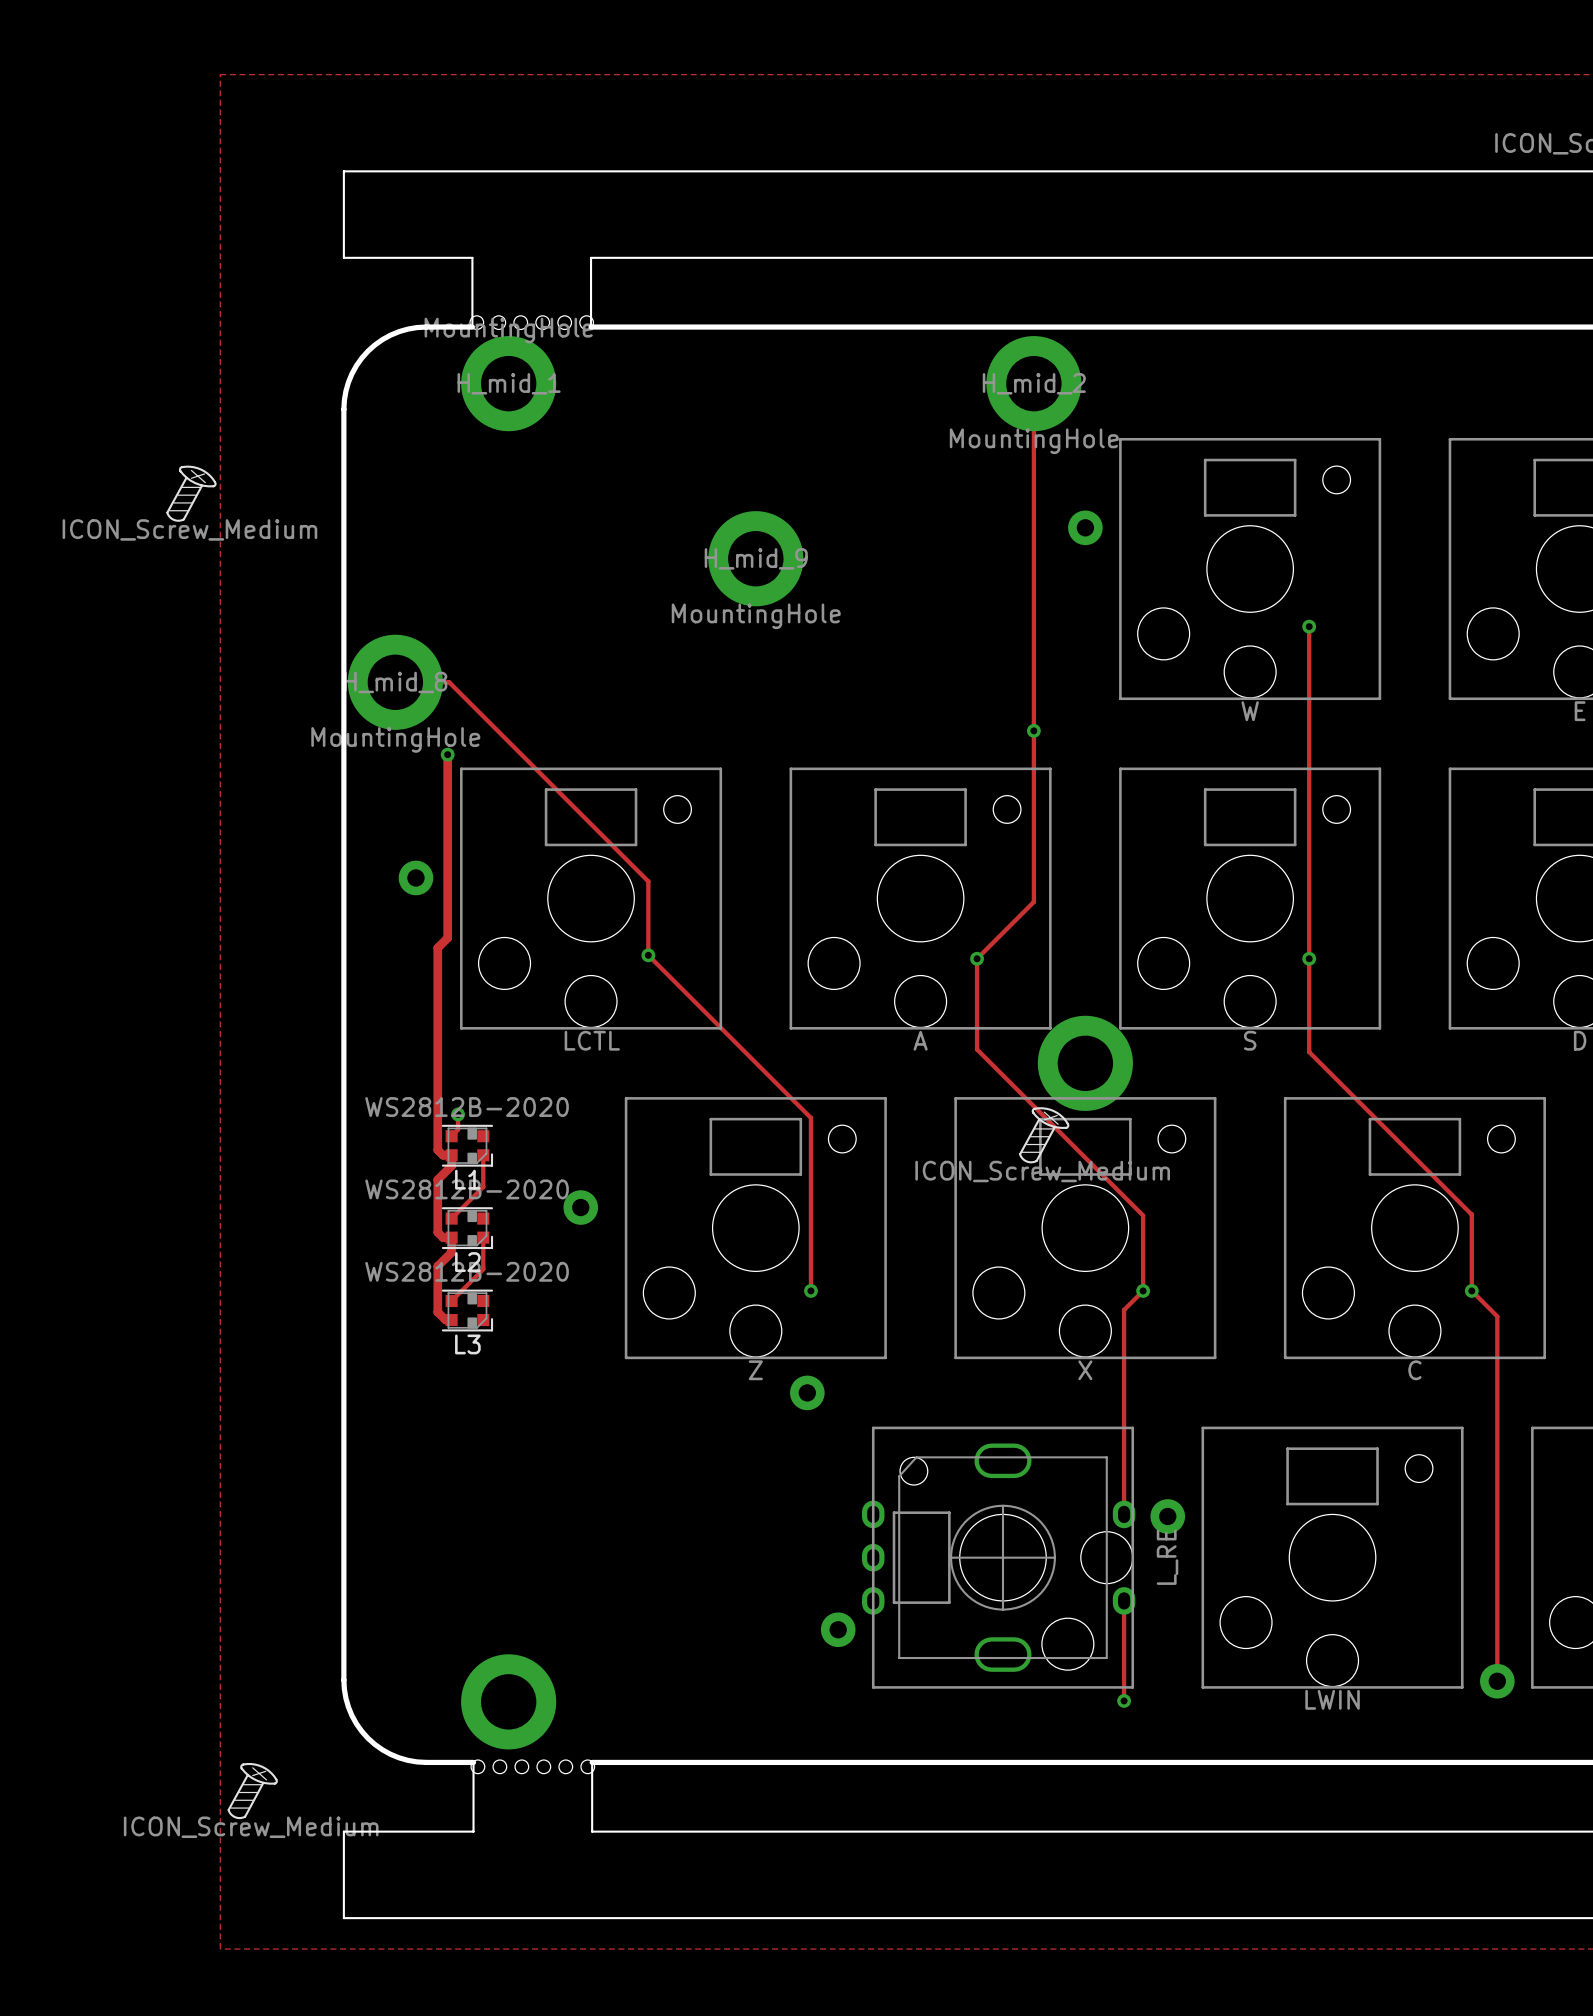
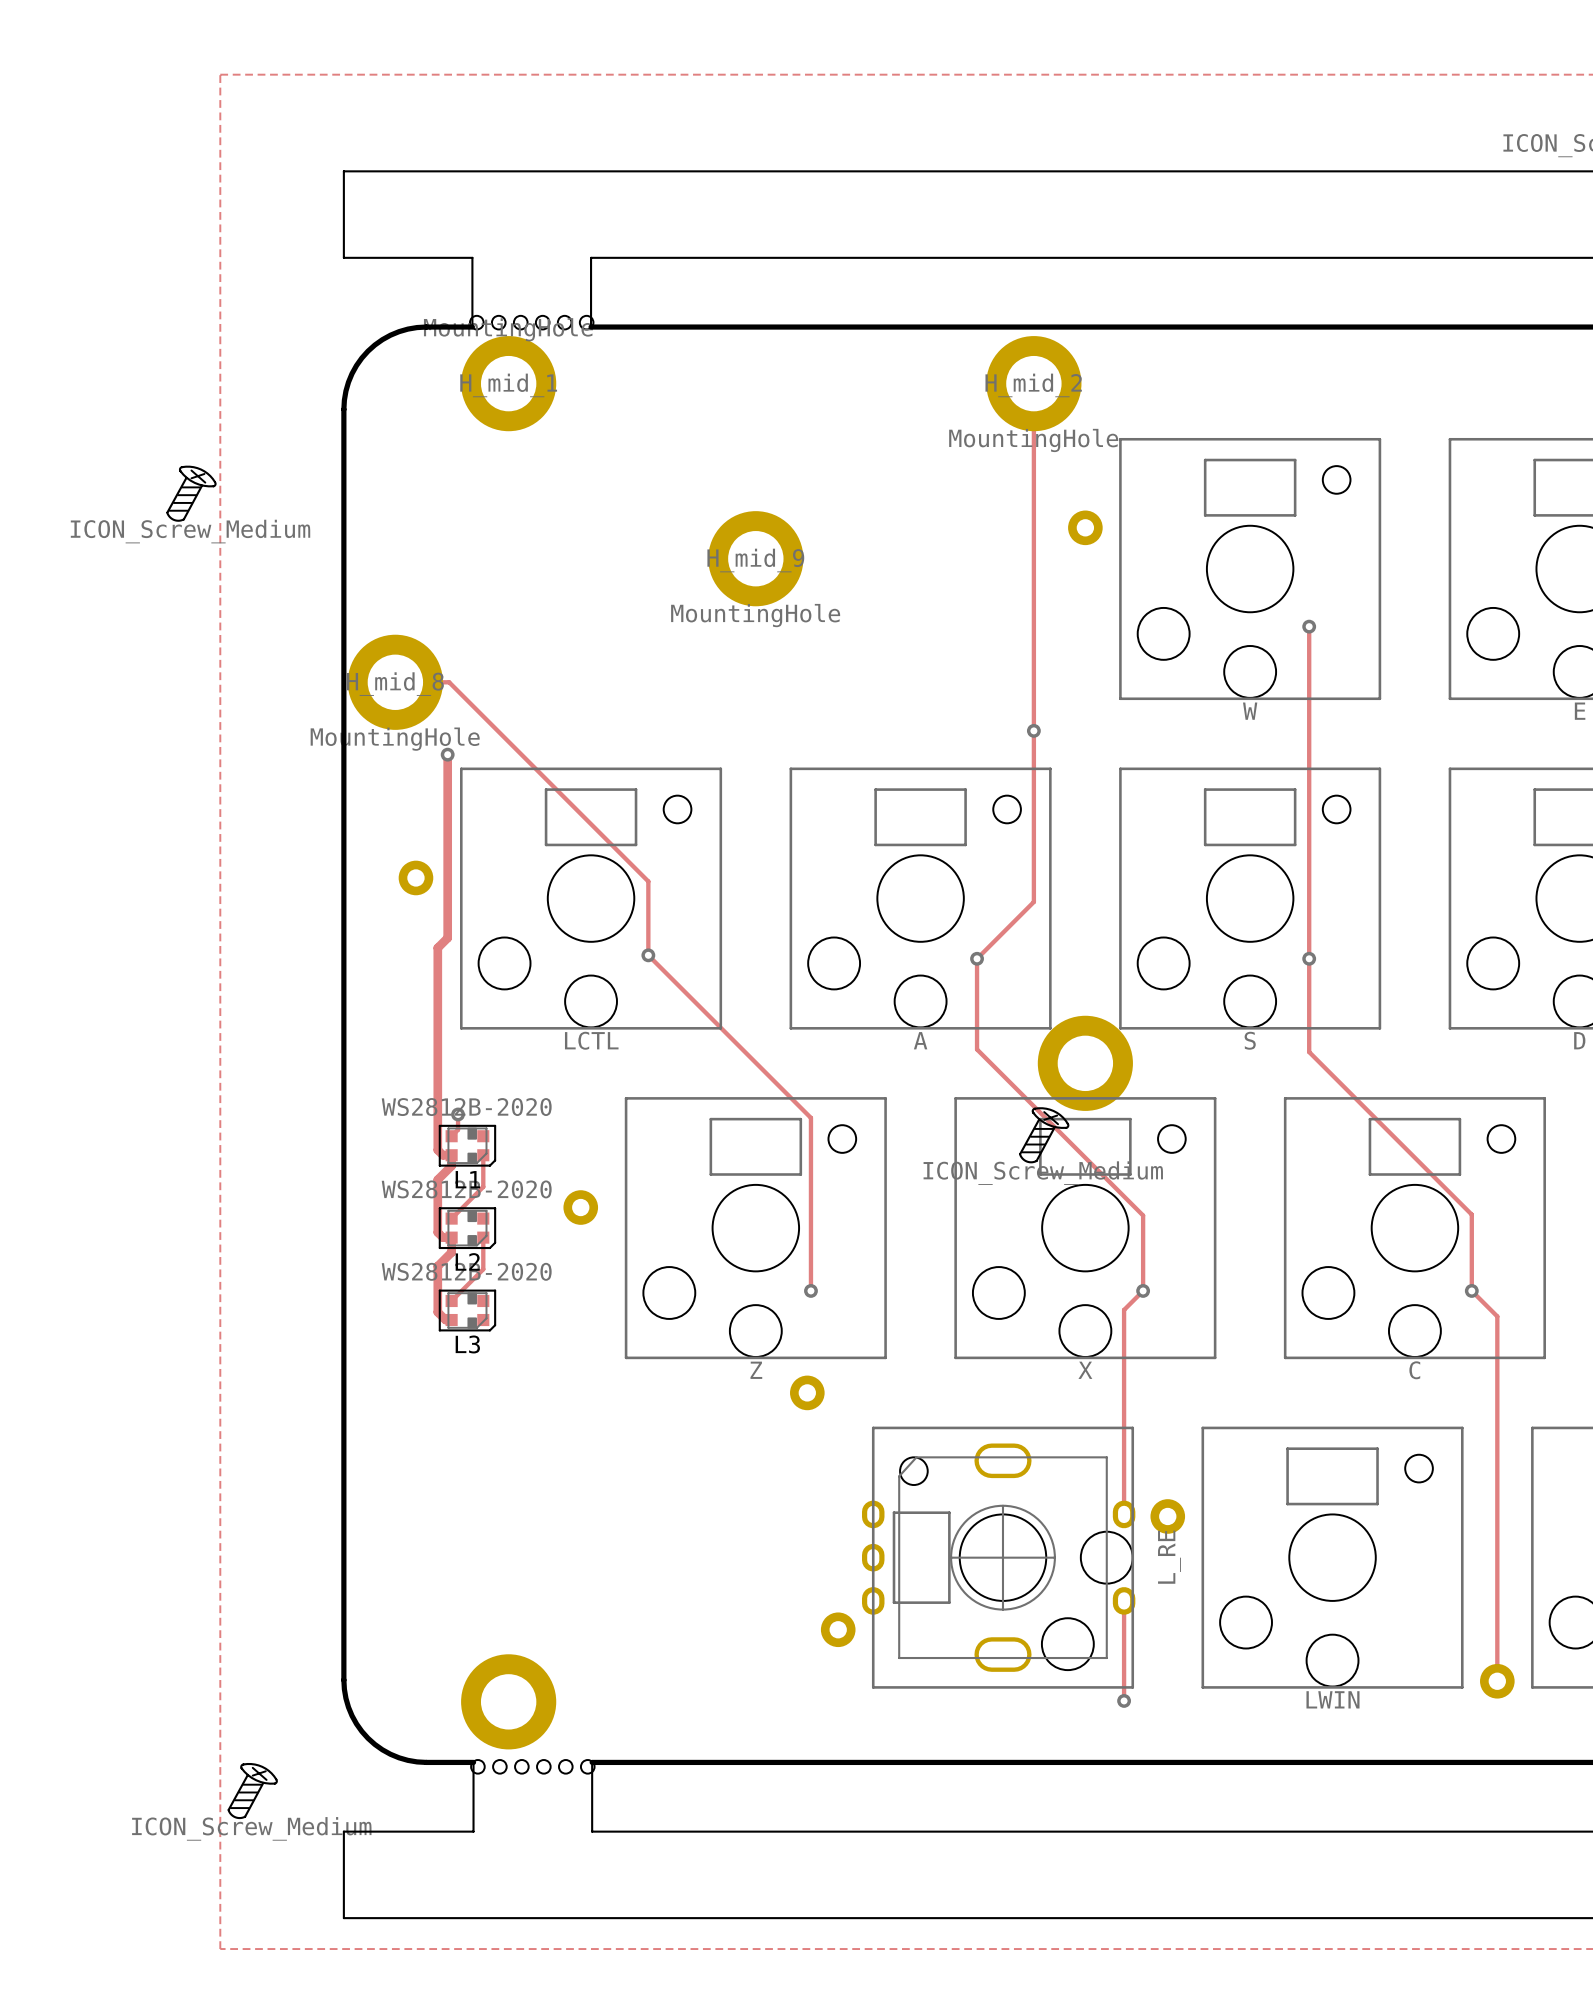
L1 footprint: [441, 1124, 494, 1167] -> [438, 1124, 497, 1167]
L2 footprint: [441, 1207, 494, 1250] -> [438, 1207, 497, 1250]
L3 footprint: [441, 1289, 494, 1332] -> [438, 1289, 497, 1332]

